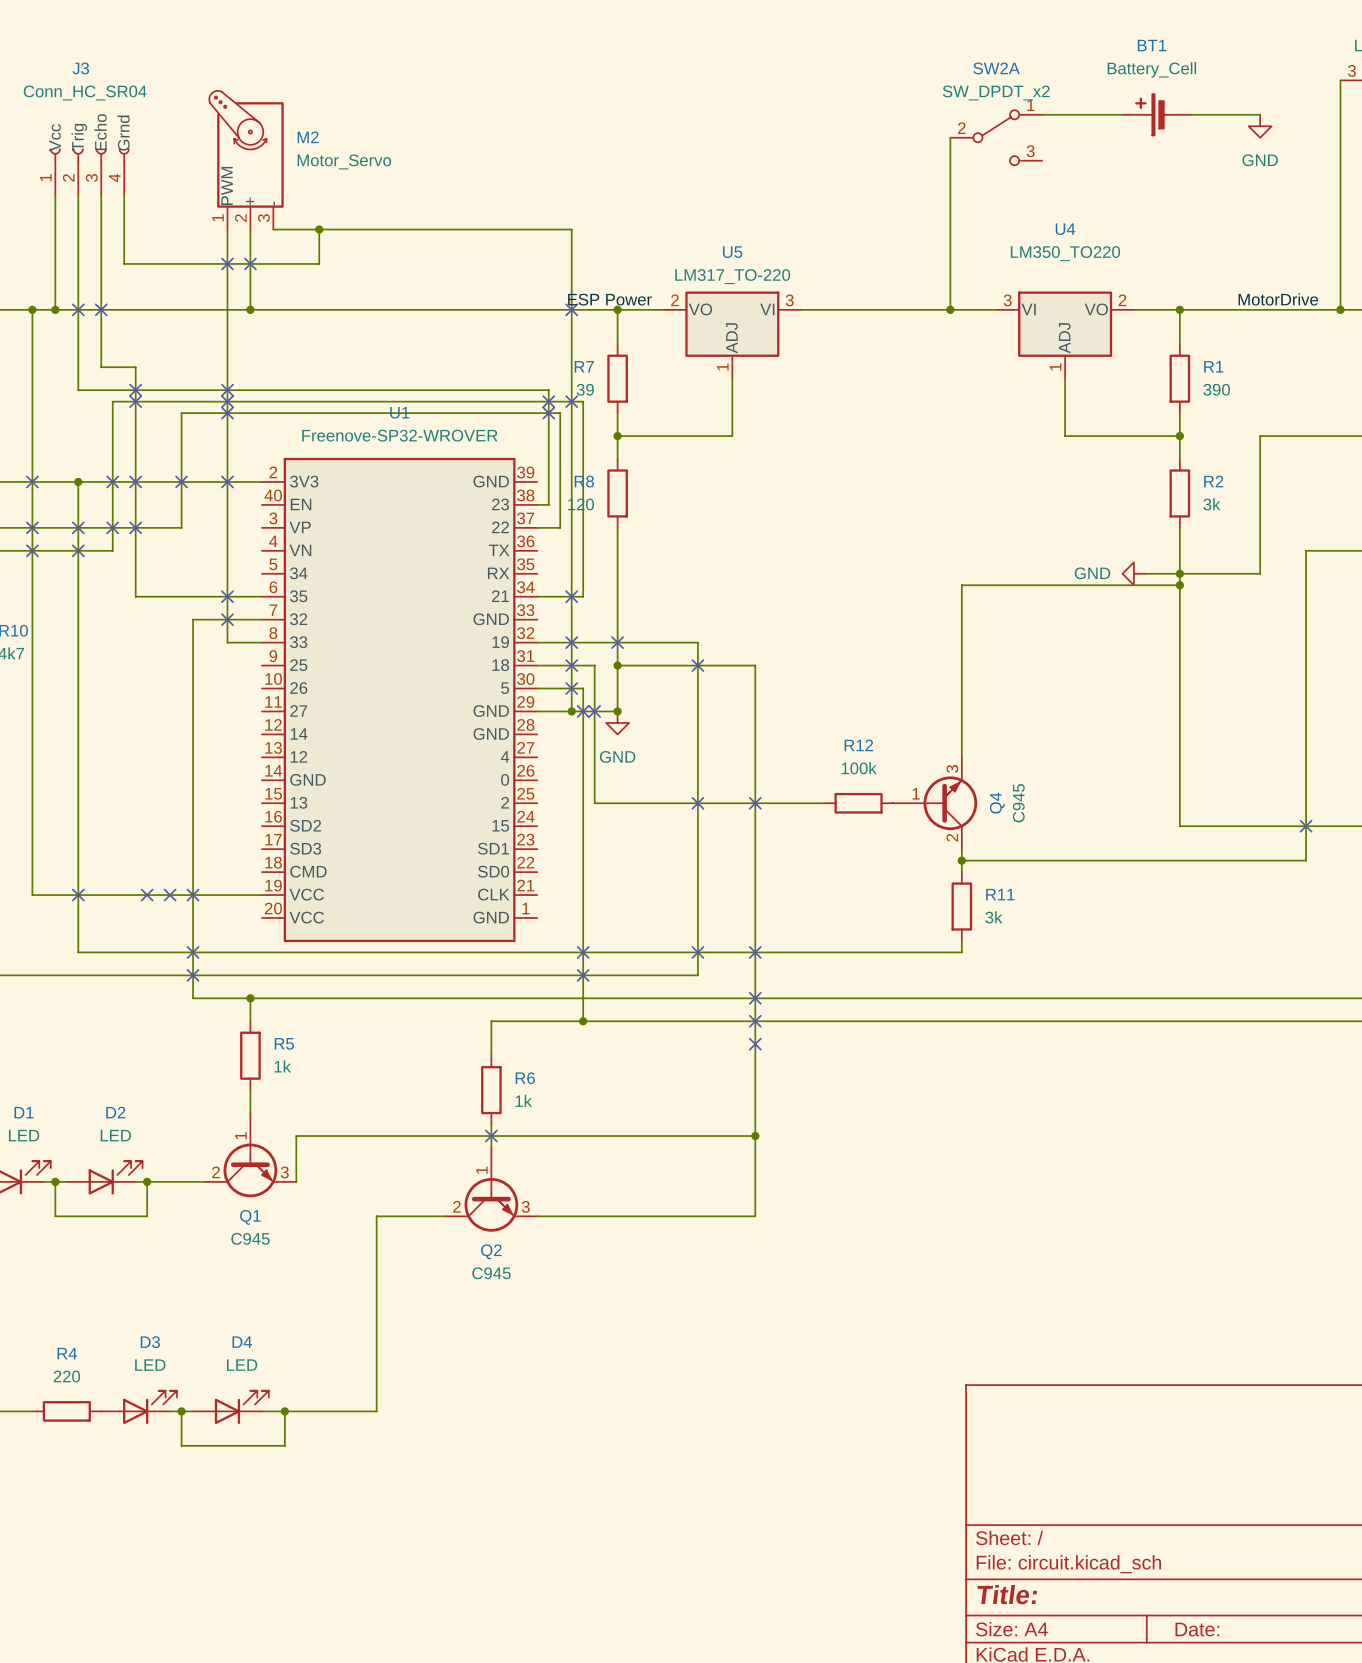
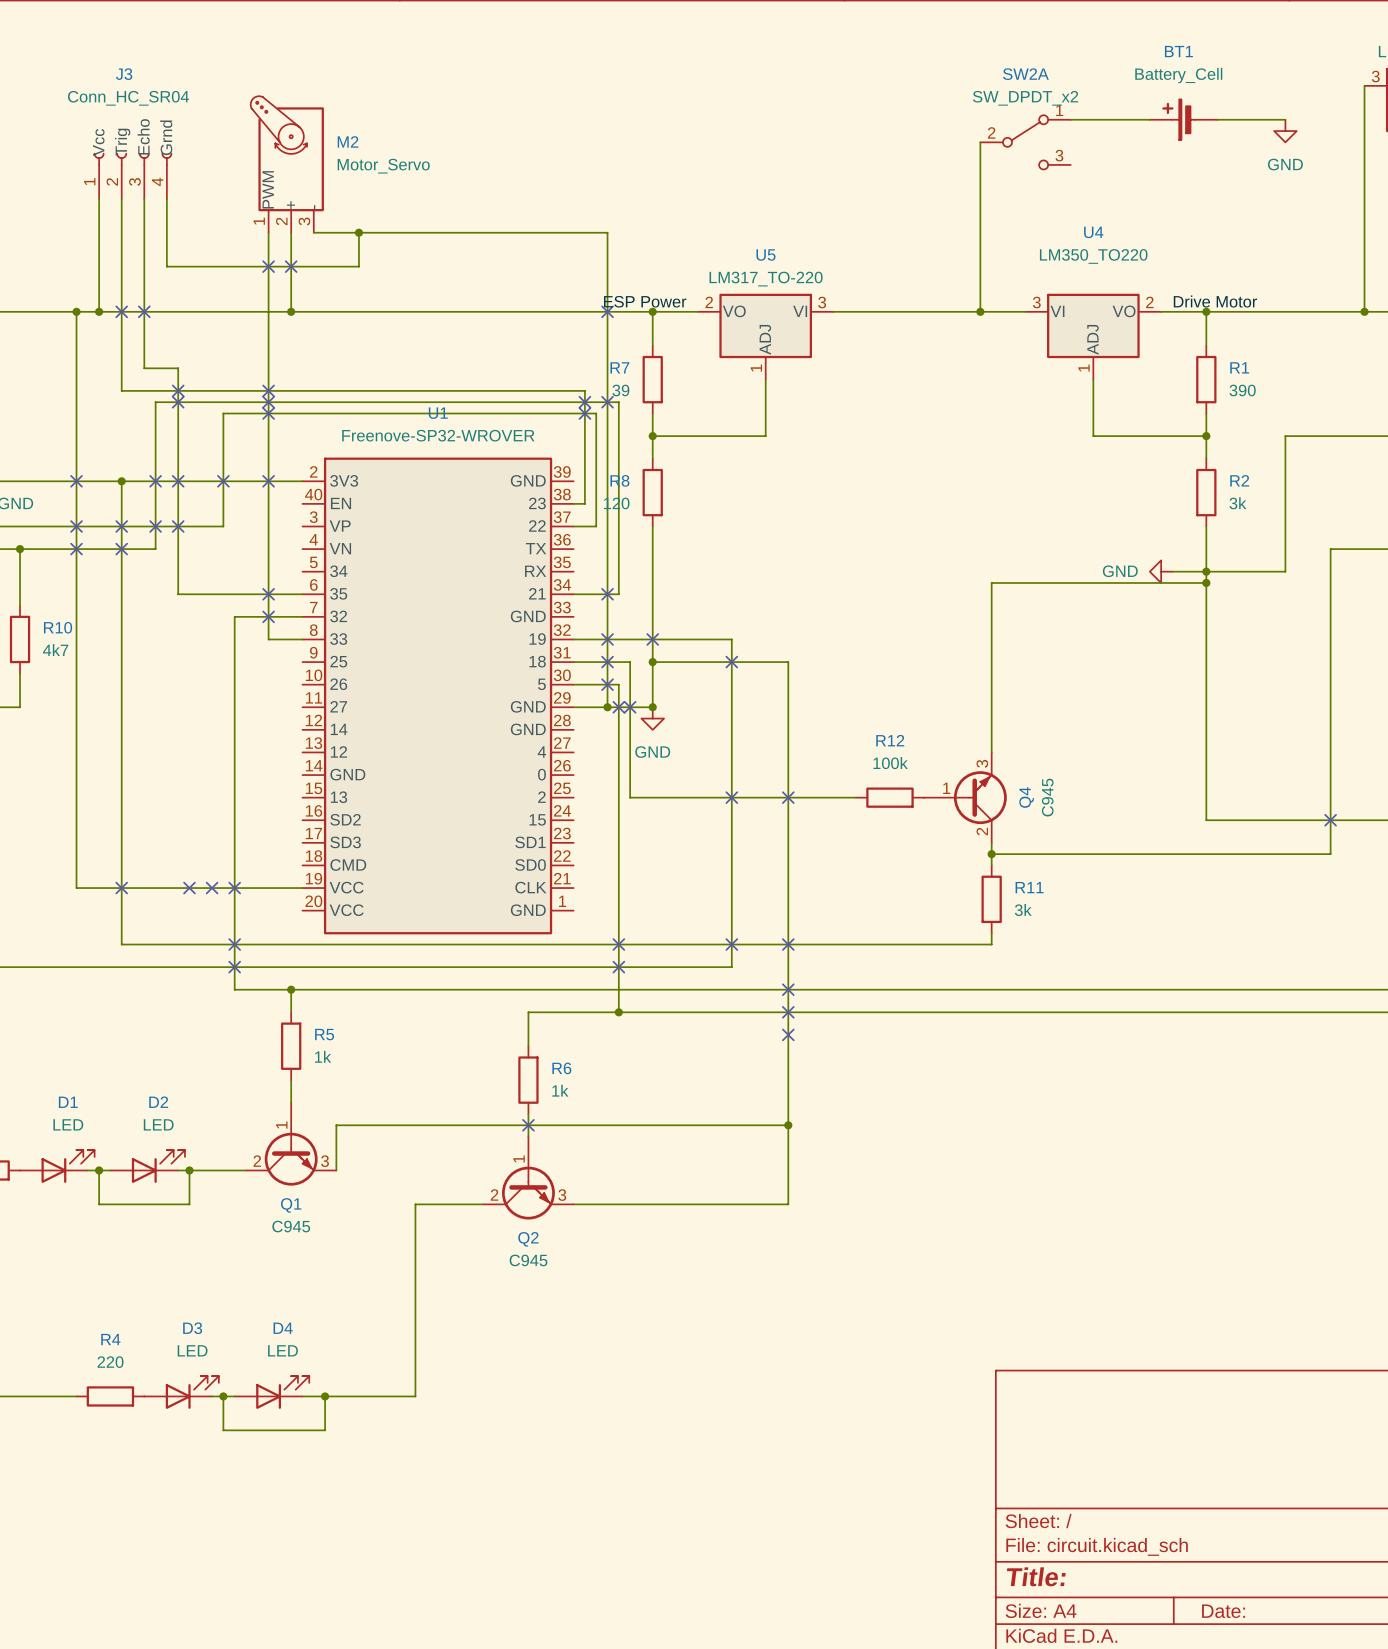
label: none -> Drive Motor (1215, 301)
label: MotorDrive (1278, 299) -> none

